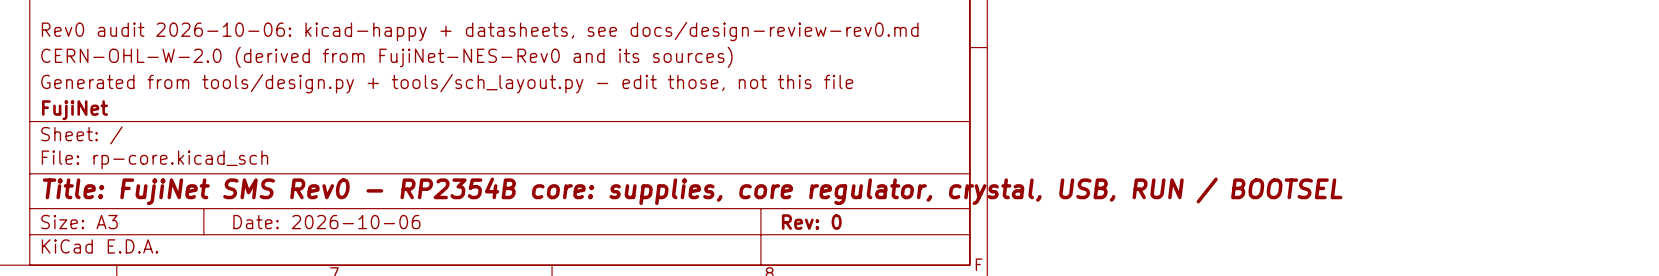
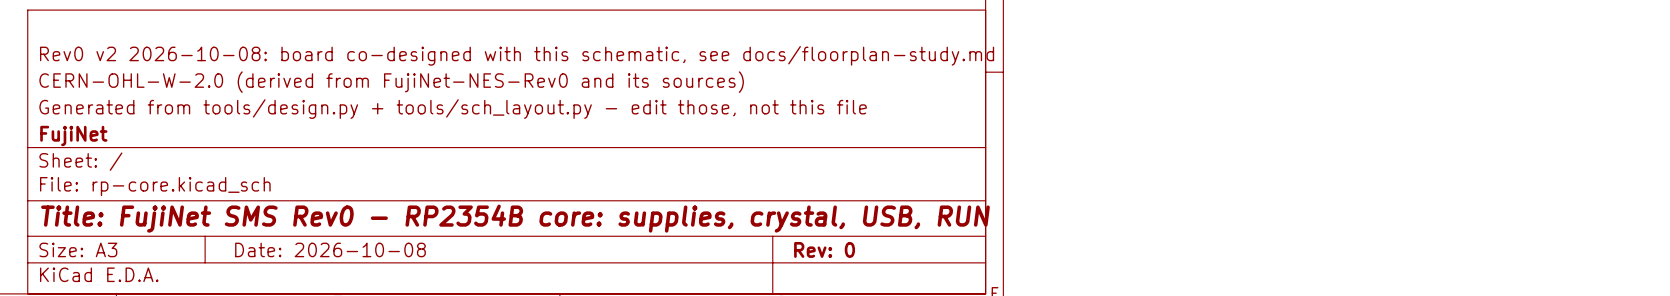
title block: Rev0 audit 2026-10-06: kicad-happy + datasheets, see docs/design-review-rev0.md (480, 31) -> Rev0 v2 2026-10-08: board co-designed with this schematic, see docs/floorplan-study.md (517, 55)
title block: Title: FujiNet SMS Rev0 - RP2354B core: supplies, core regulator, crystal, USB, RUN / BOOTSEL (692, 191) -> Title: FujiNet SMS Rev0 - RP2354B core: supplies, crystal, USB, RUN (515, 218)
title block: Date: 2026-10-06 (326, 222) -> Date: 2026-10-08 (330, 249)

